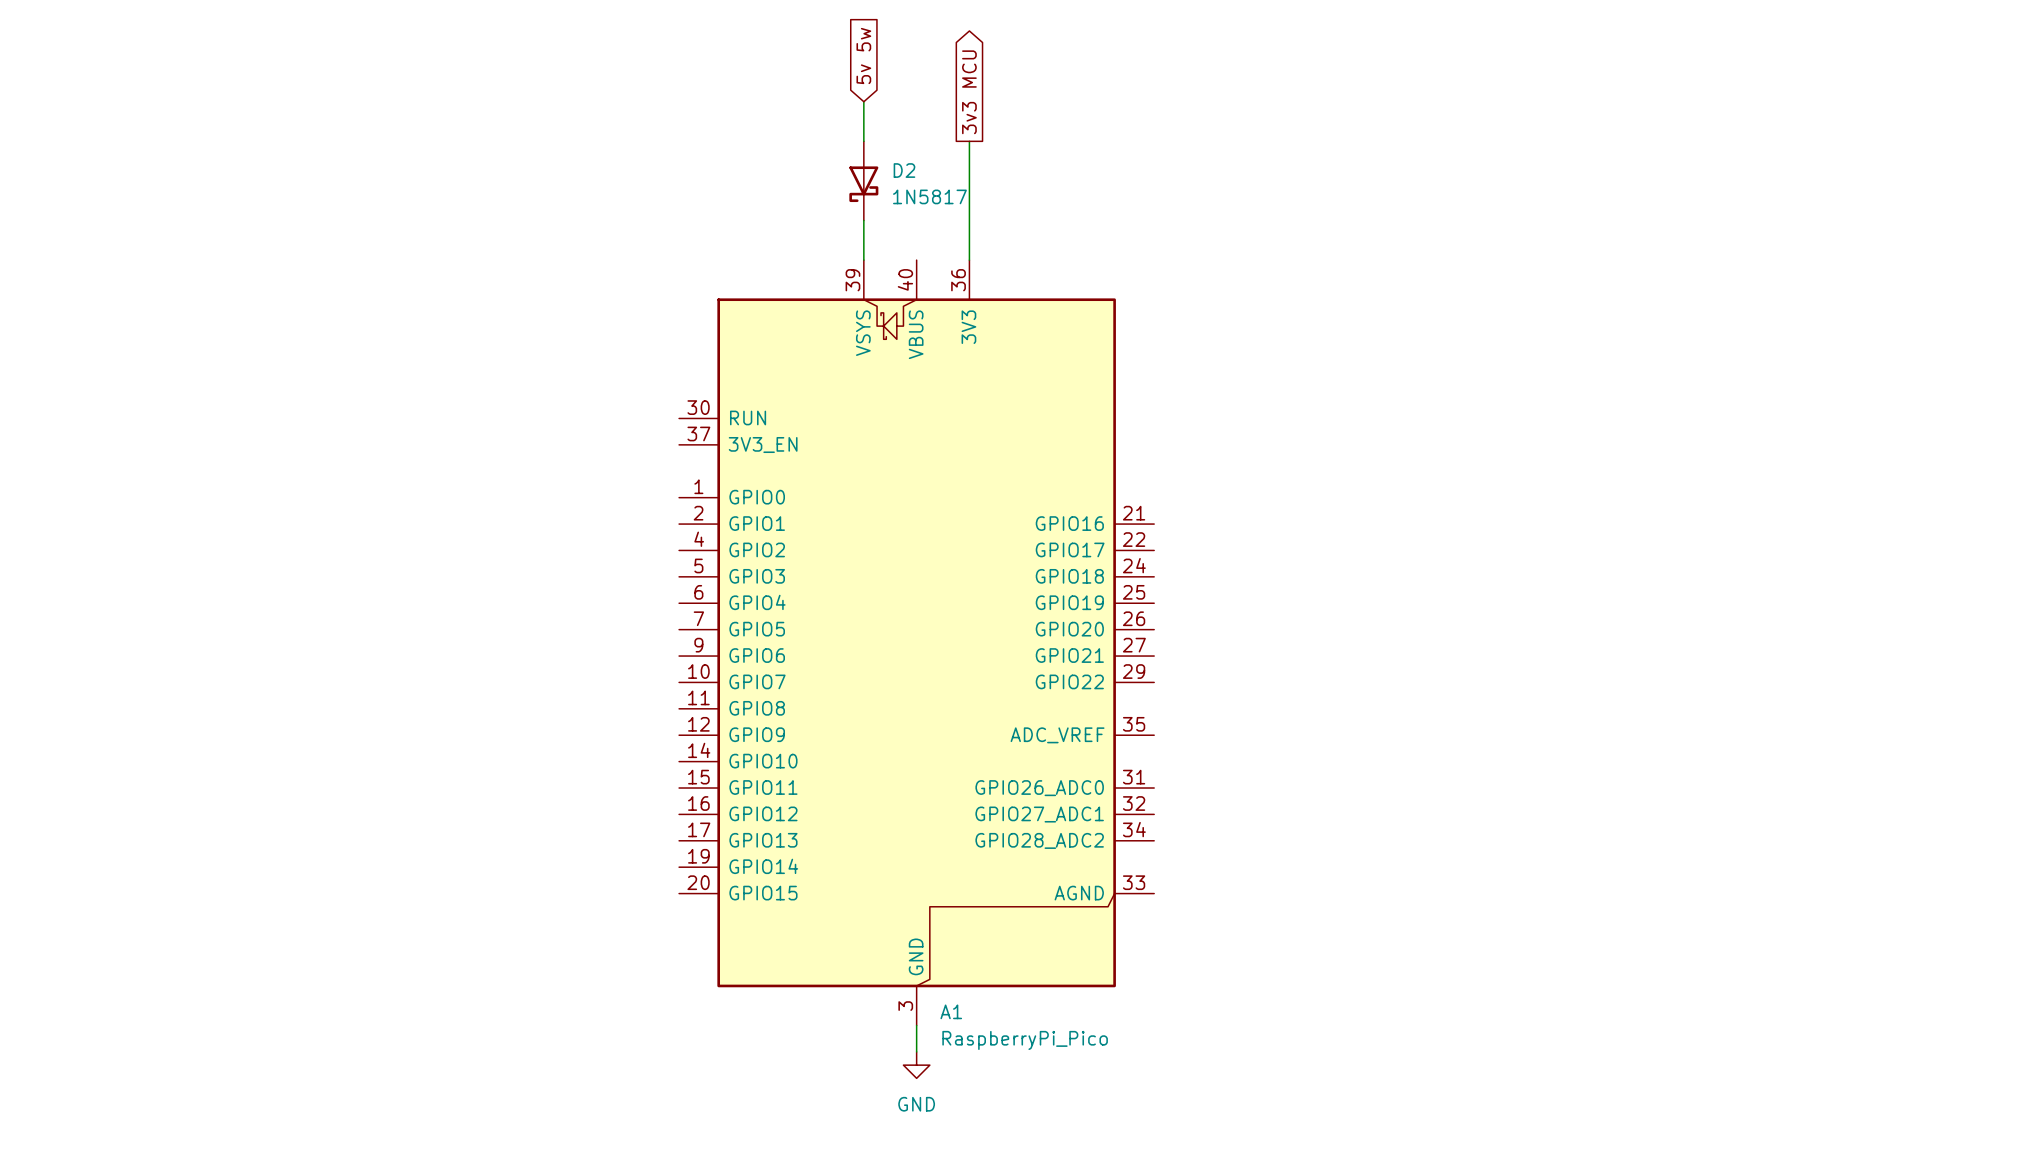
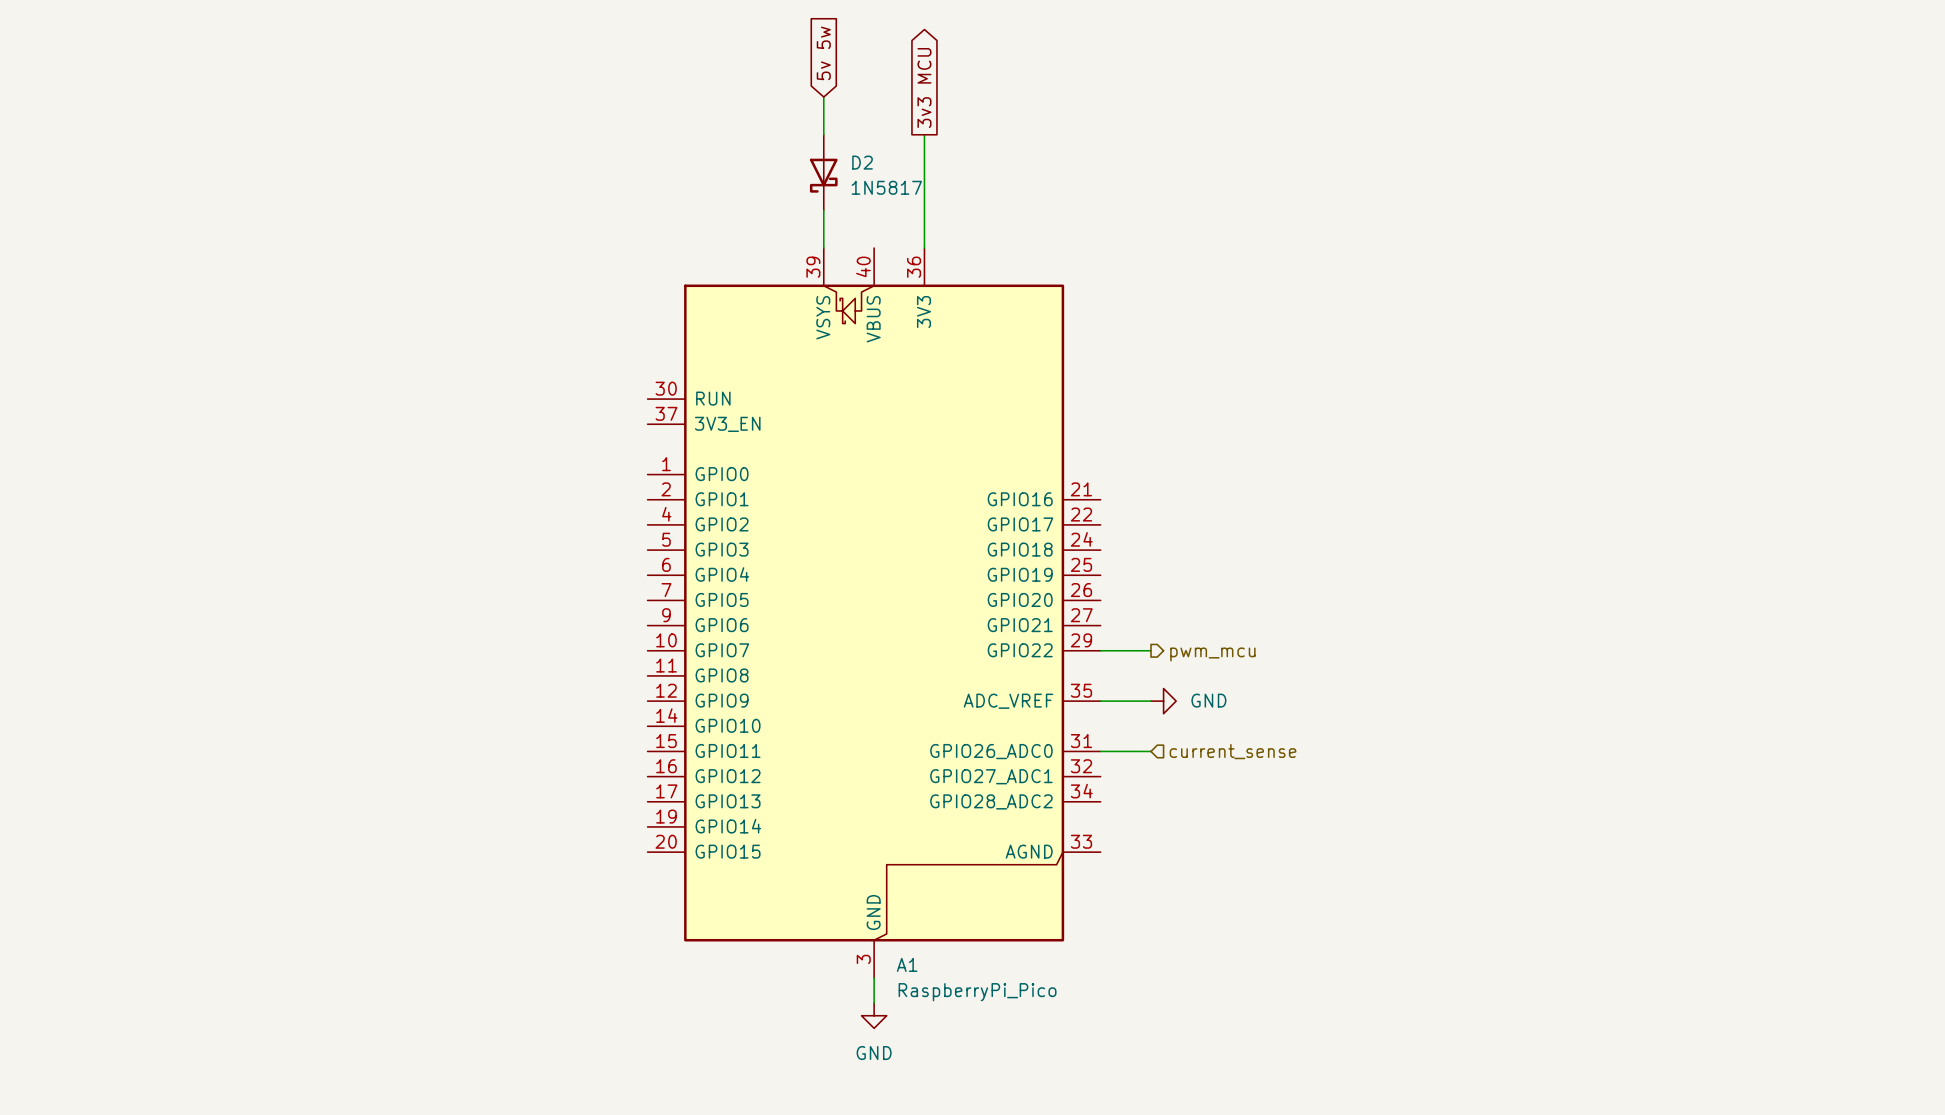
wire: none -> (1100, 650) (1150, 650)
hierarchical label: none -> pwm_mcu (1212, 654)
wire: none -> (1100, 701) (1150, 701)
power symbol: none -> GND (1163, 701)
wire: none -> (1100, 751) (1150, 751)
hierarchical label: none -> current_sense (1232, 751)

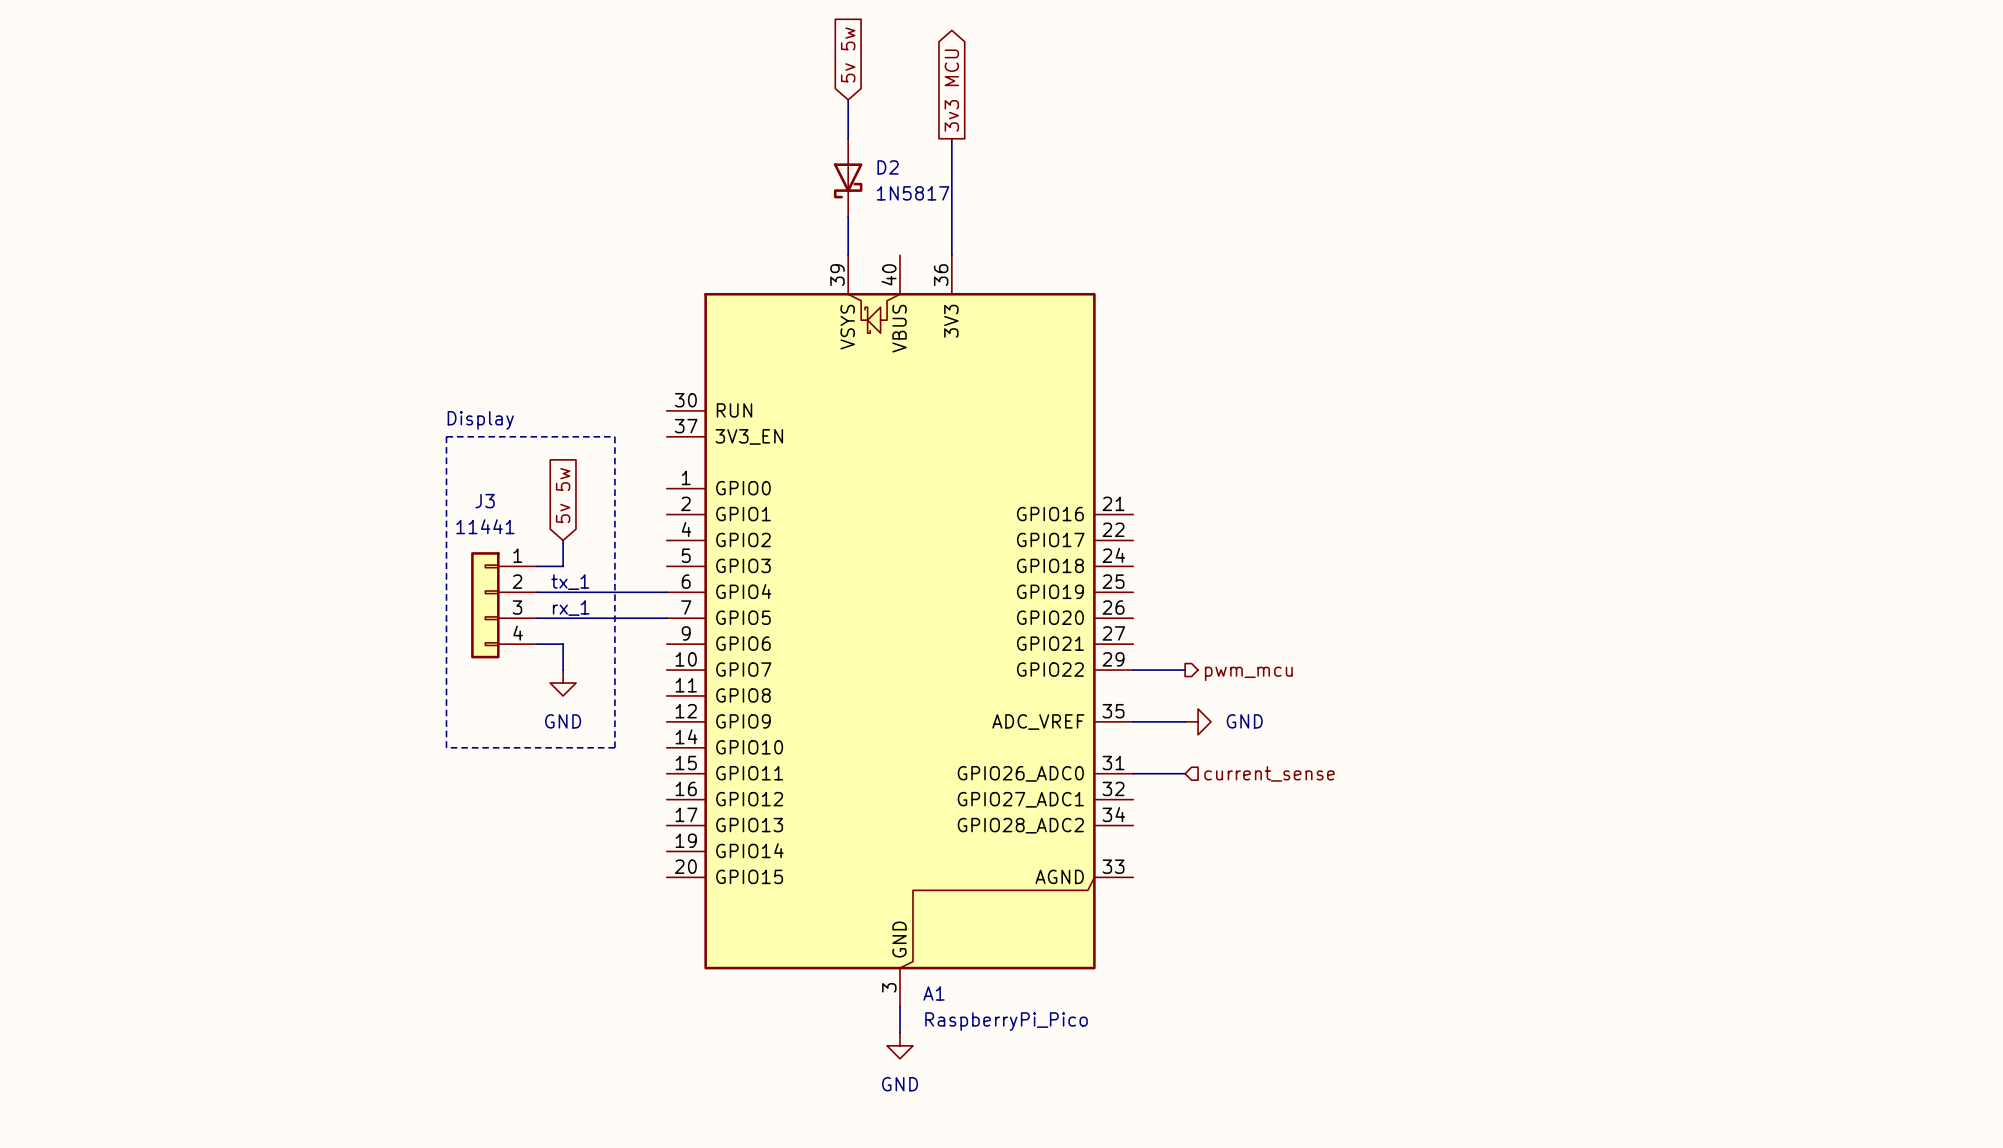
text: none -> Display (480, 420)
line: none -> (446, 436) (614, 436) (614, 747) (446, 747) (446, 436)
global label: none -> 5v 5w (563, 495)
wire: none -> (563, 540) (563, 566) (537, 566)
text: none -> tx_1 (570, 582)
wire: none -> (537, 592) (666, 592)
J3: none -> 11441 (504, 605)
text: none -> rx_1 (571, 608)
wire: none -> (537, 618) (666, 618)
wire: none -> (537, 644) (563, 644) (563, 670)
power symbol: none -> GND (563, 683)

